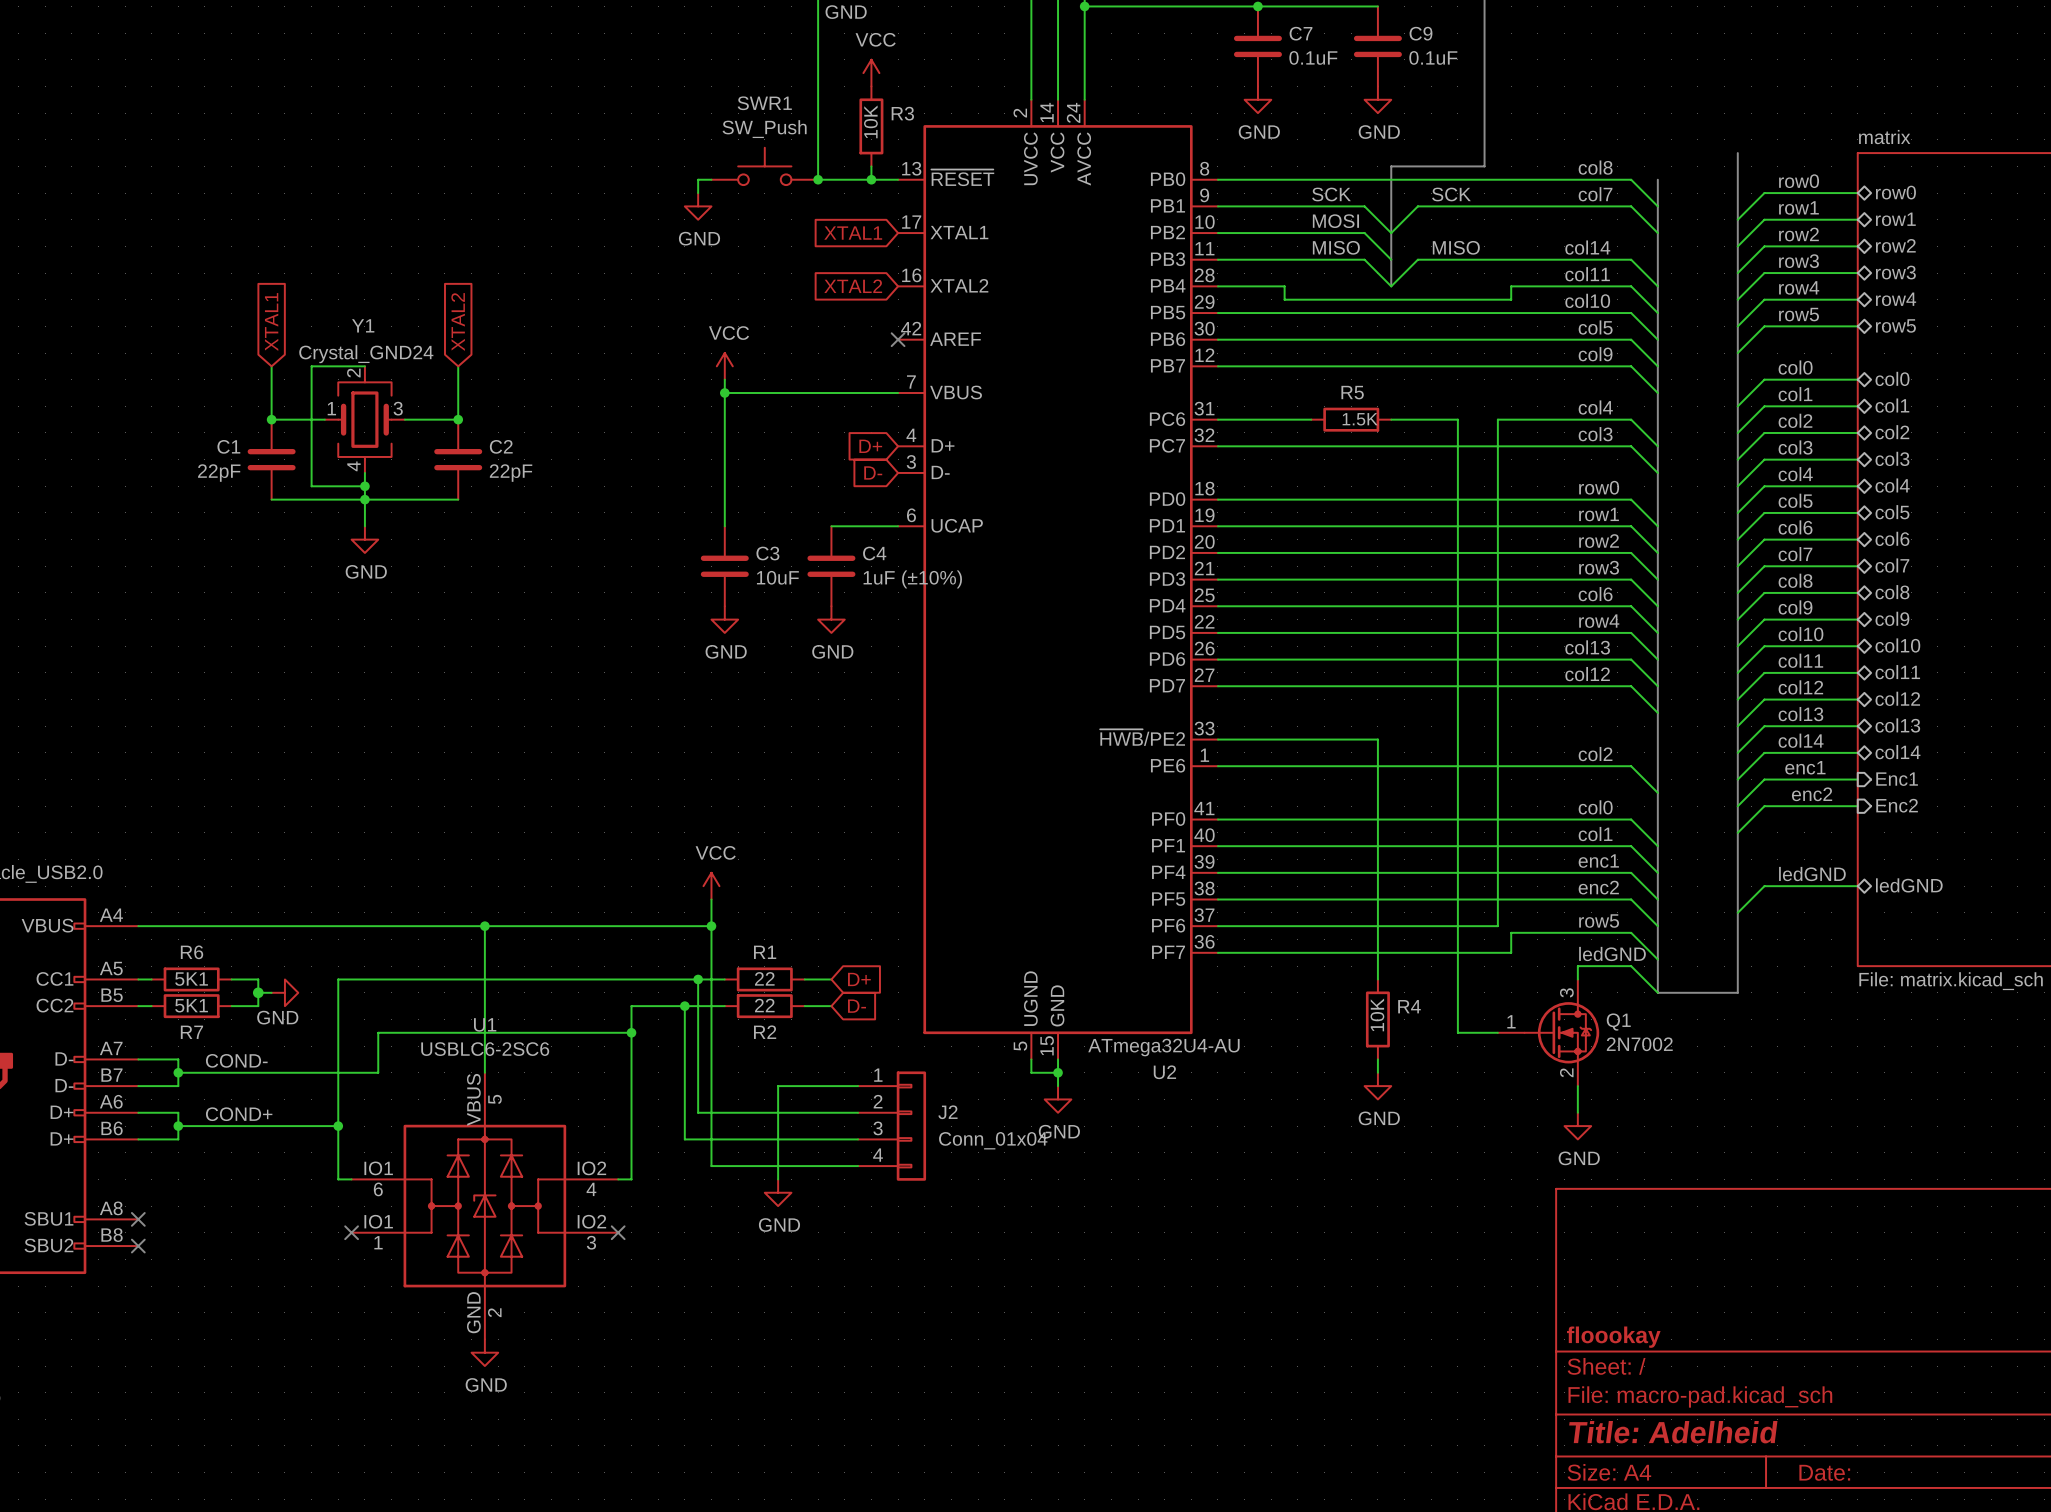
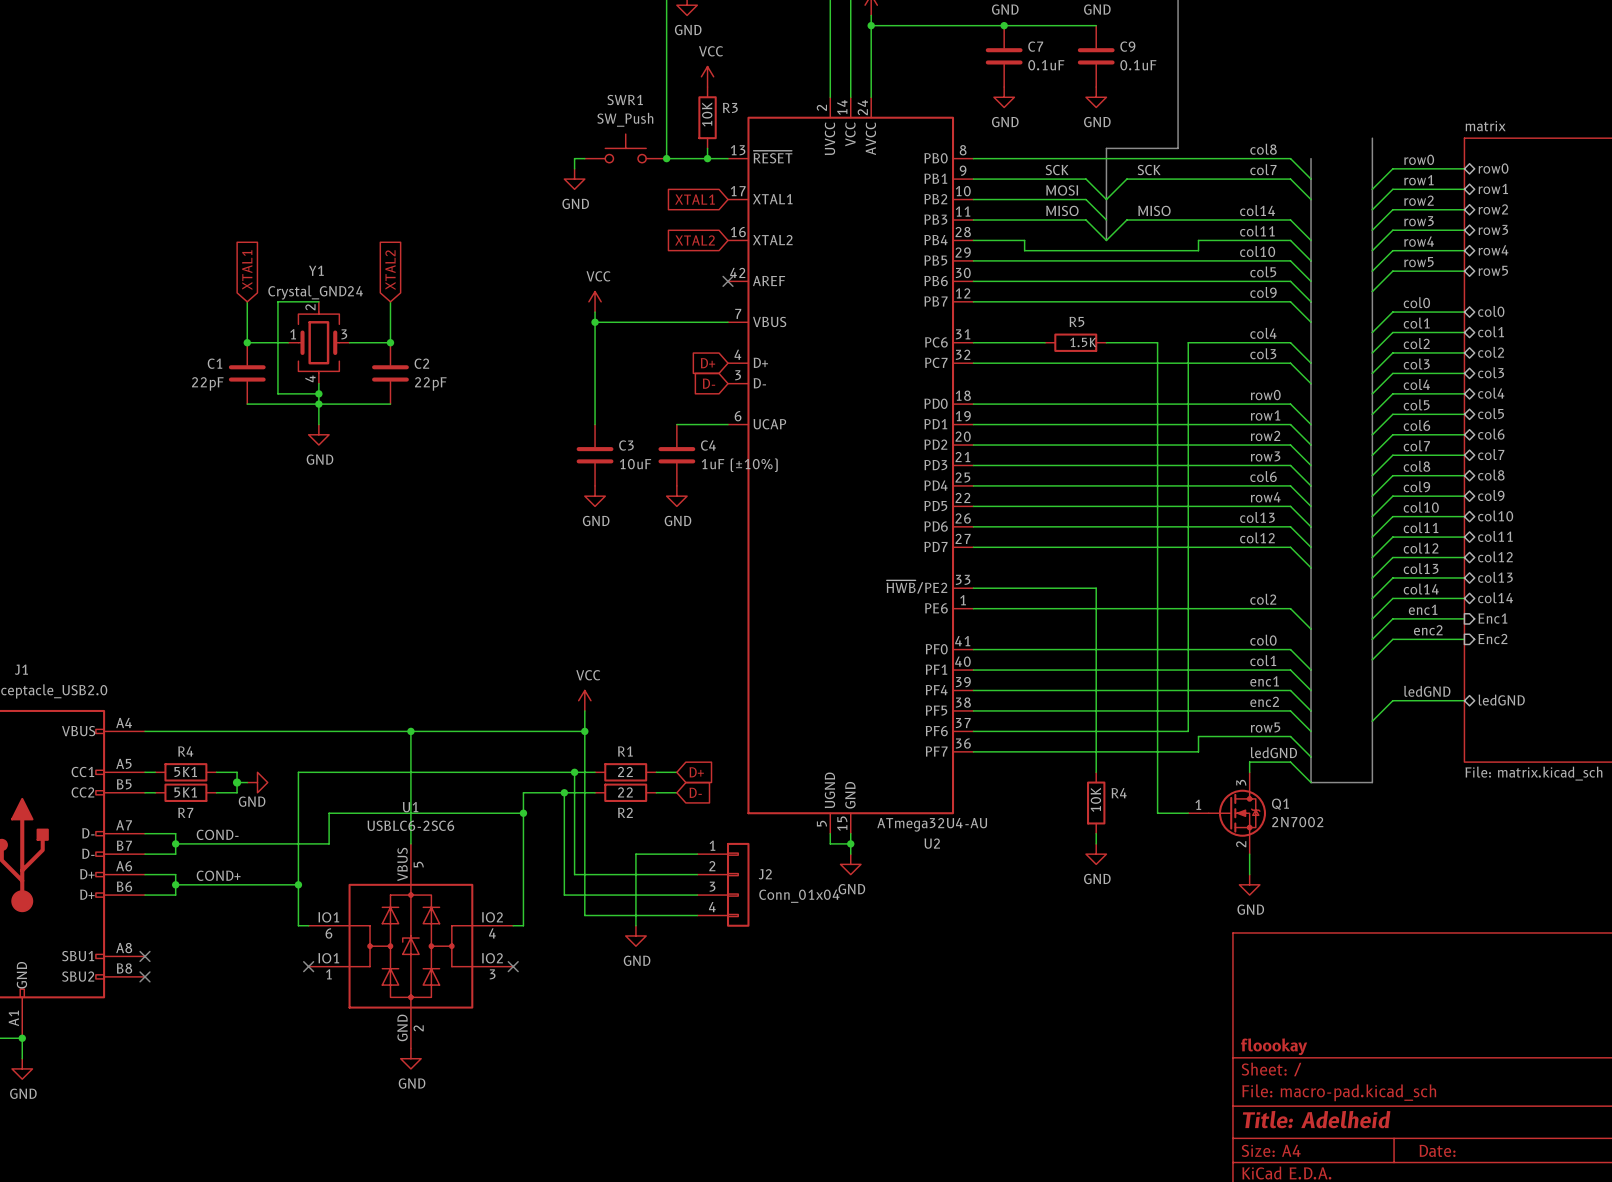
R6 name: R6 (192, 952) -> R4 (185, 751)

